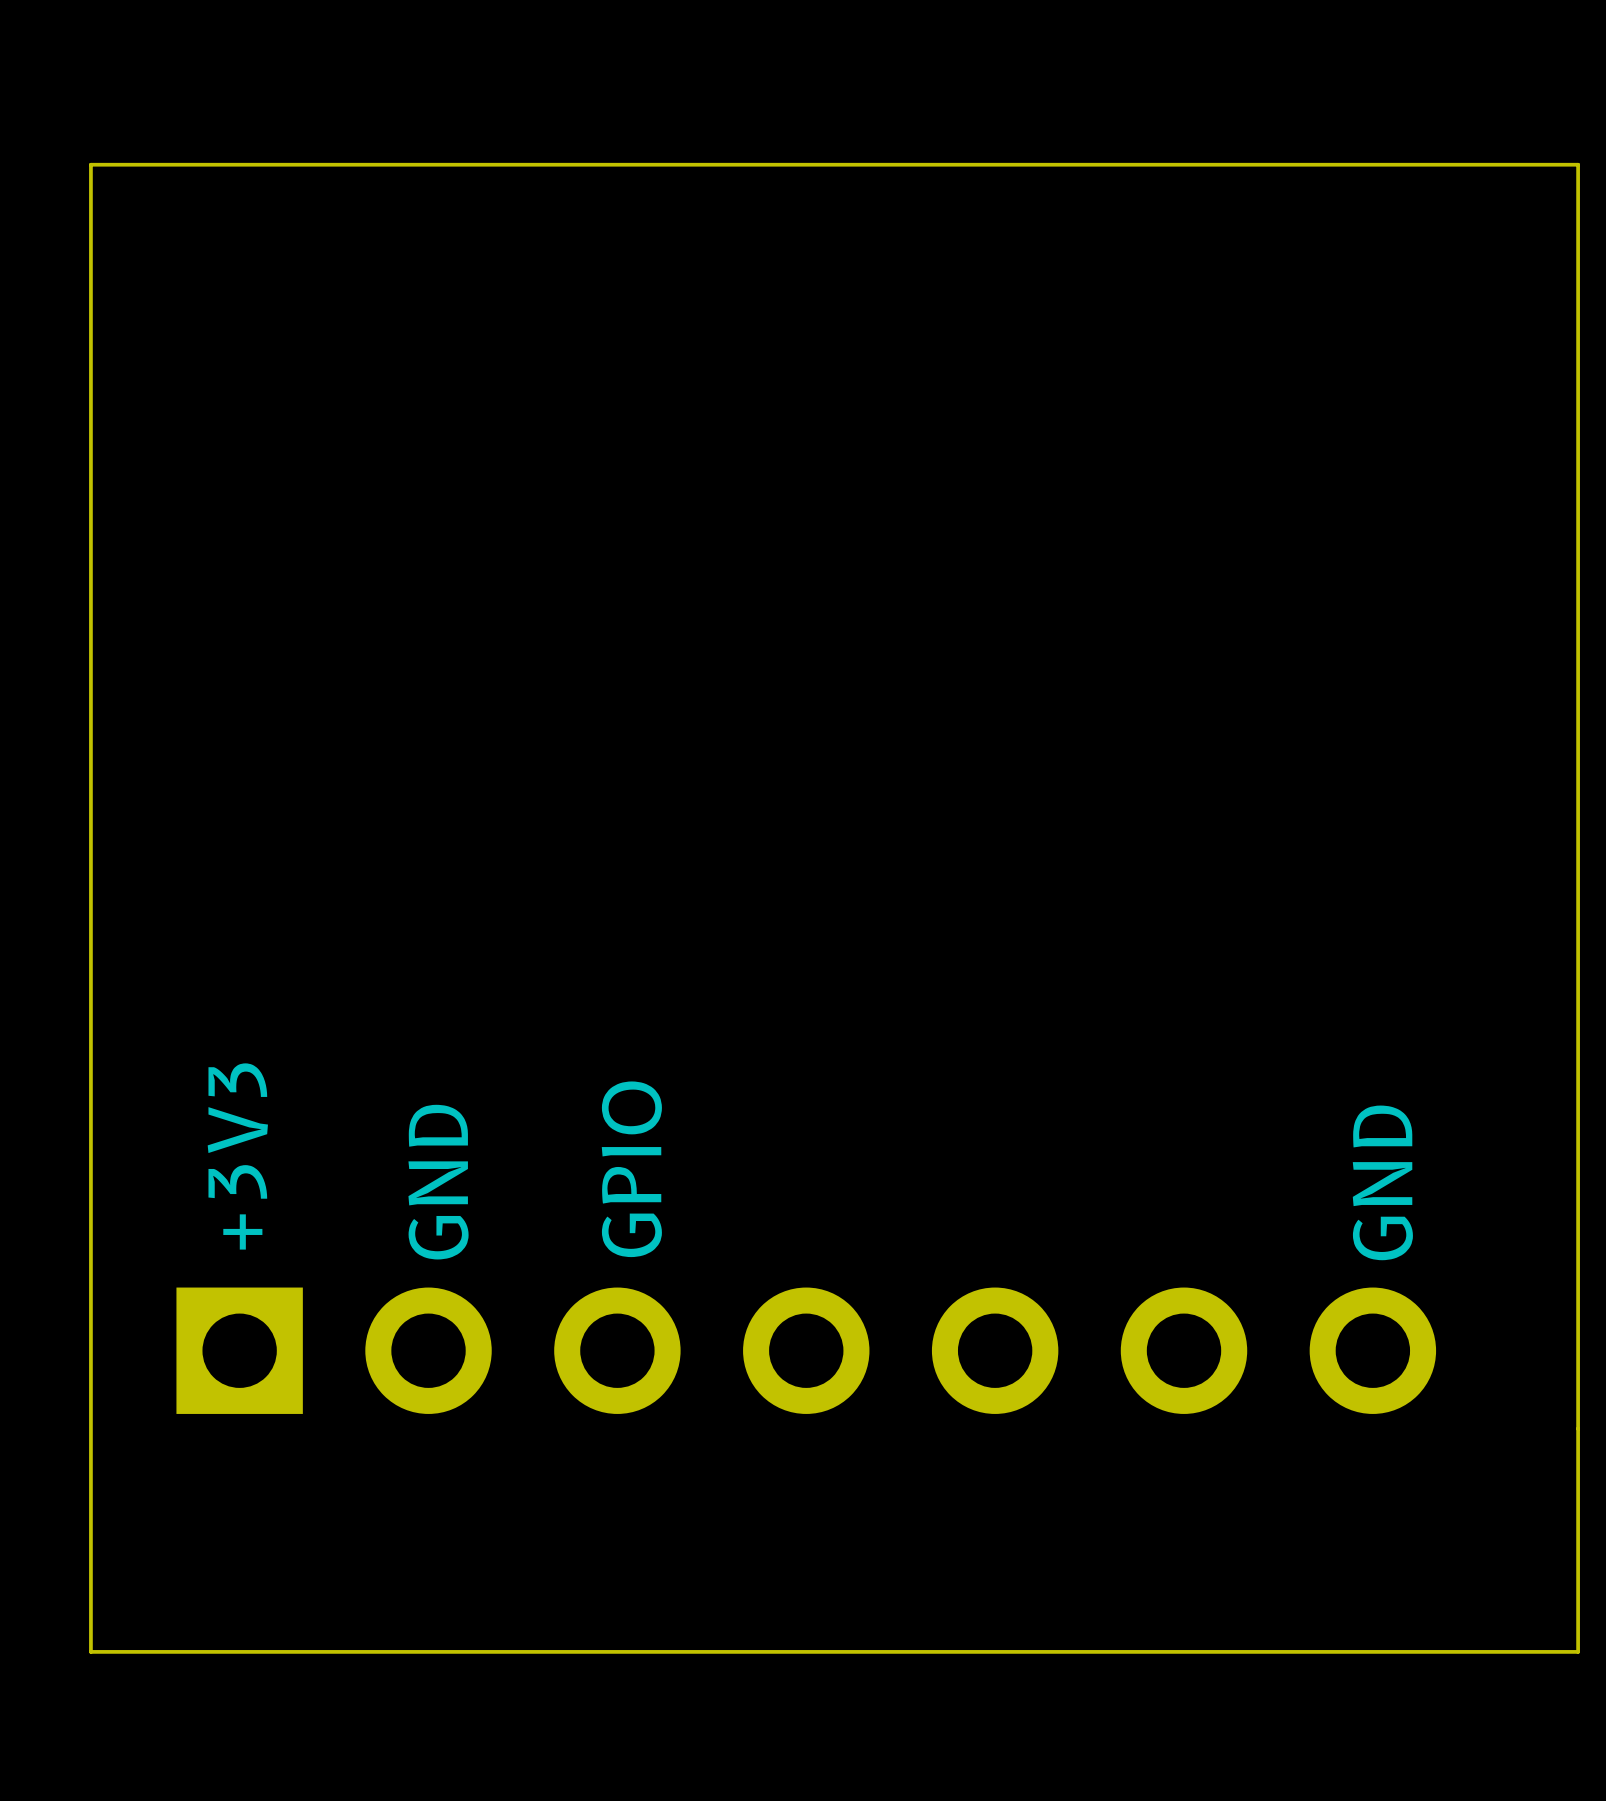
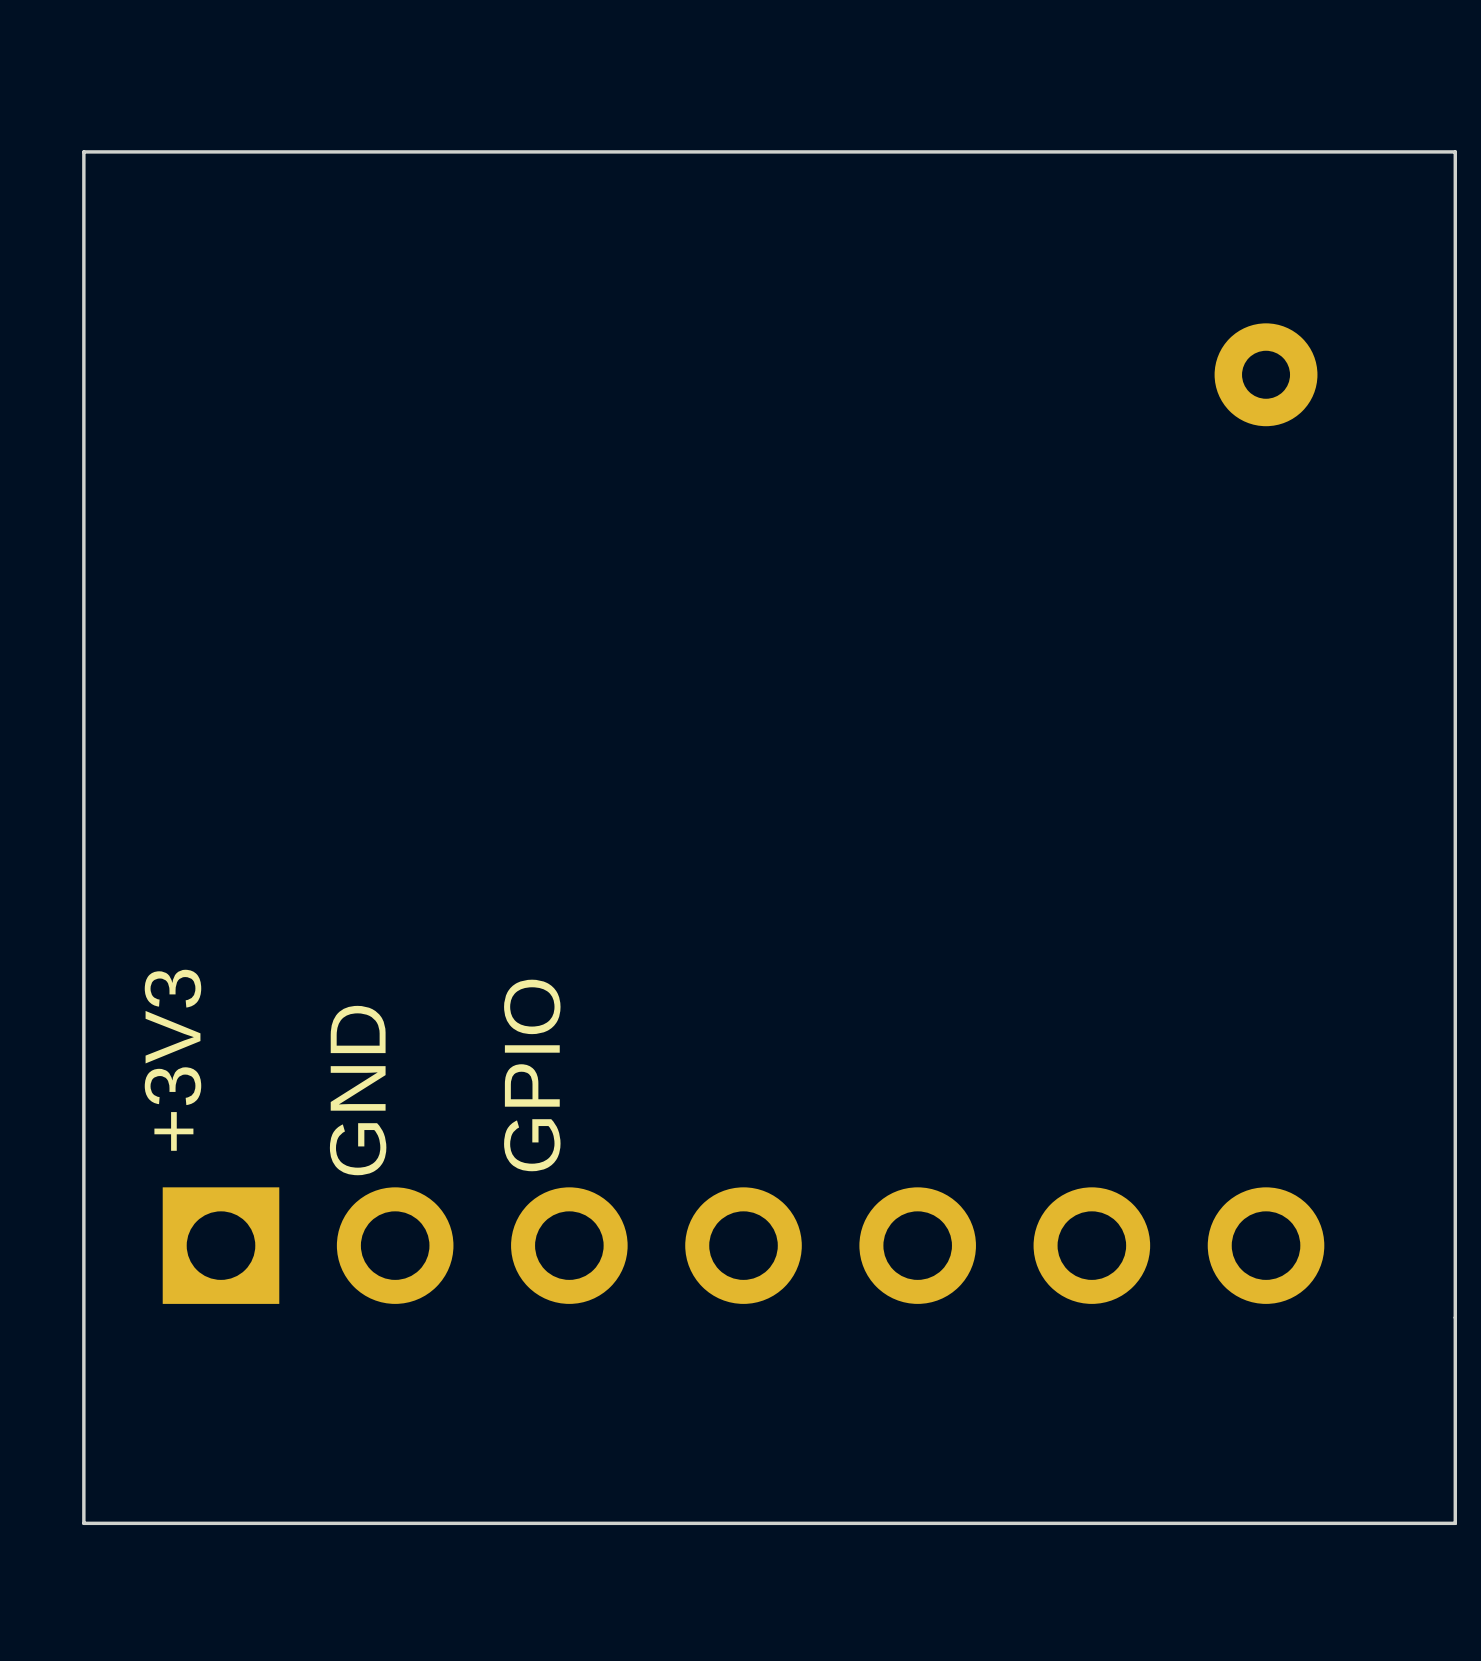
part: none -> (1266, 374)
text position: +3V3 (237, 1156) -> +3V3 (172, 1060)
text position: GPIO (631, 1169) -> GPIO (532, 1075)
text position: GND (438, 1182) -> GND (358, 1090)
text: GND (1382, 1182) -> none

